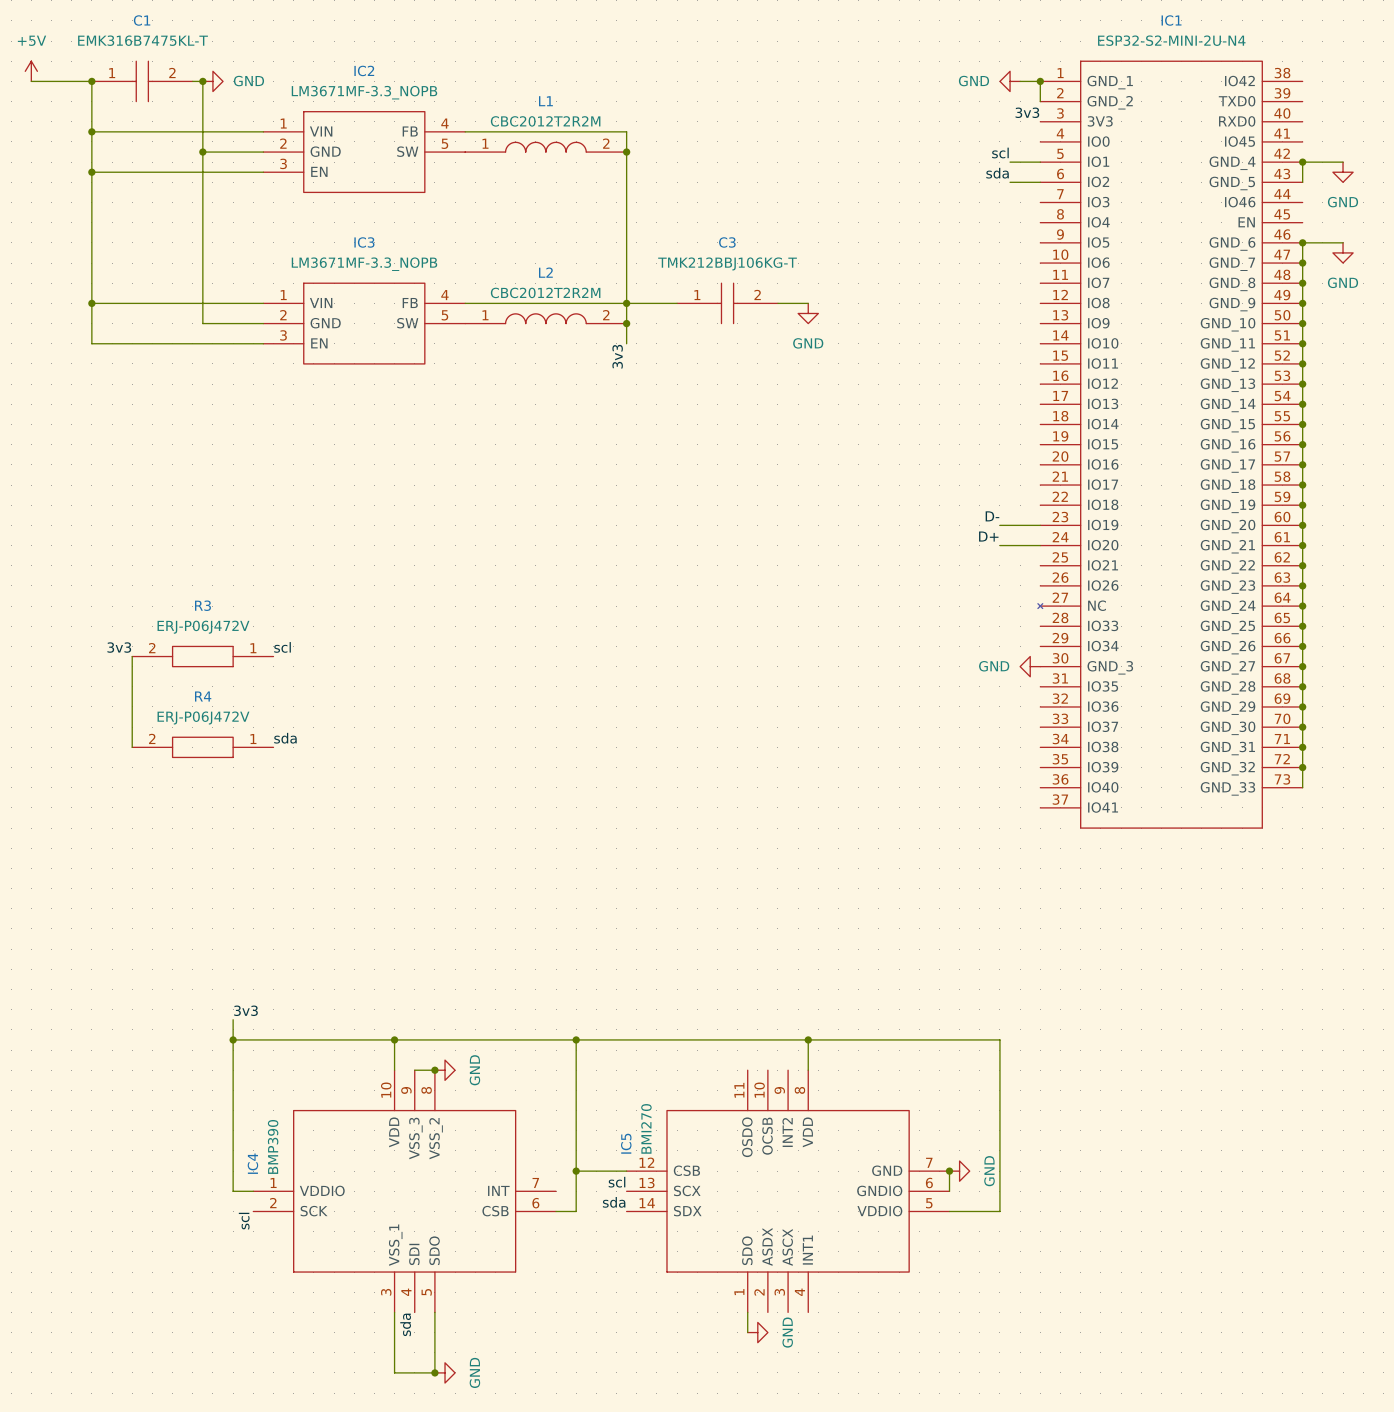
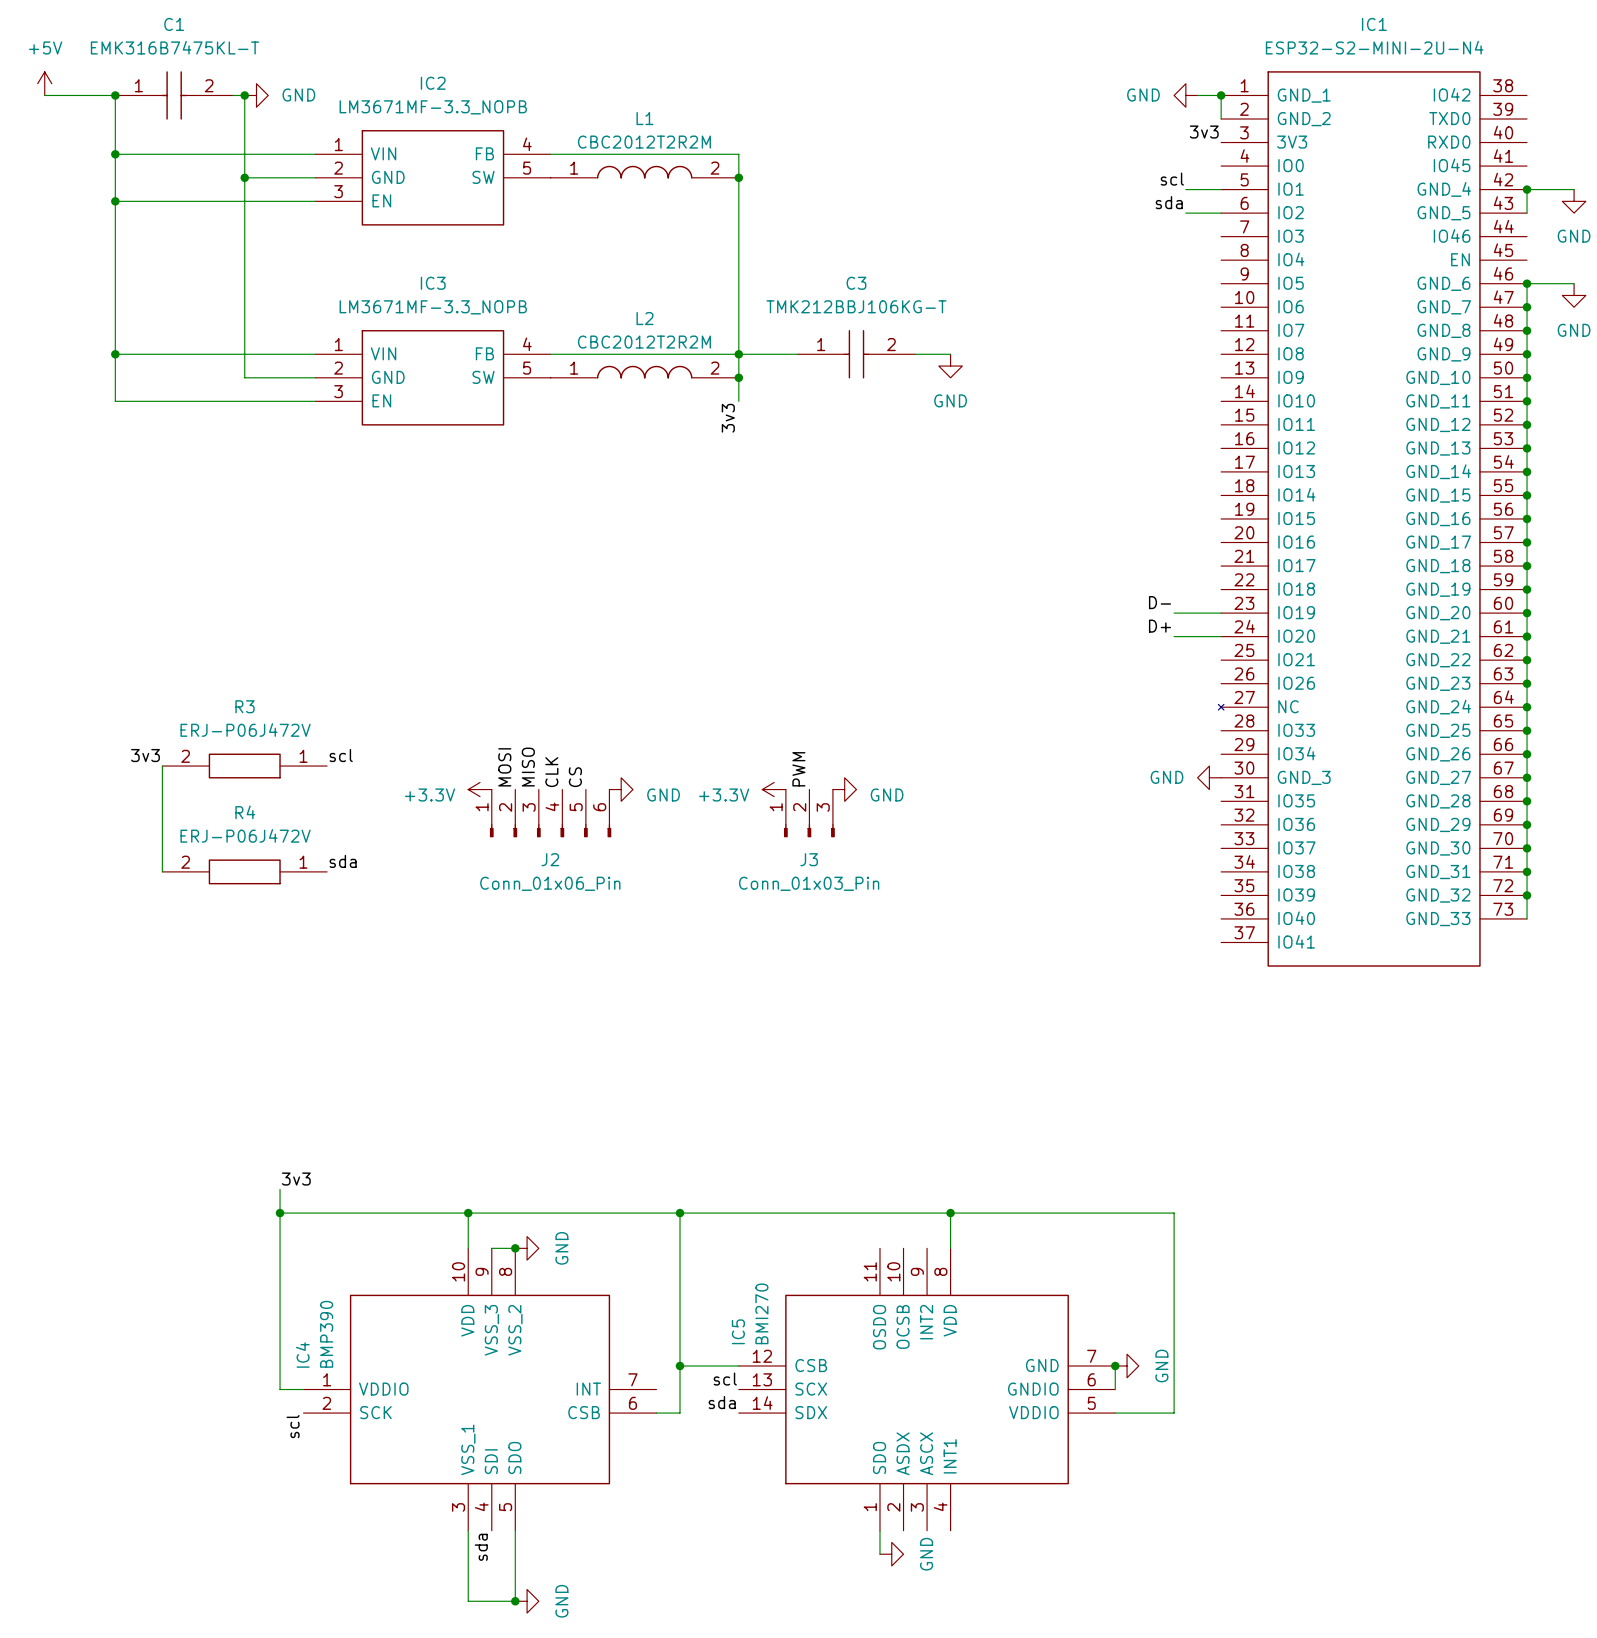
label: none -> MOSI (504, 767)
label: none -> MISO (528, 767)
label: none -> PWM (798, 769)
label: none -> CLK (551, 772)
label: none -> CS (575, 777)
power symbol: none -> +3.3V (480, 789)
power symbol: none -> GND (621, 789)
power symbol: none -> +3.3V (774, 789)
power symbol: none -> GND (844, 789)
J2: none -> Conn_01x06_Pin (550, 813)
J3: none -> Conn_01x03_Pin (809, 813)

